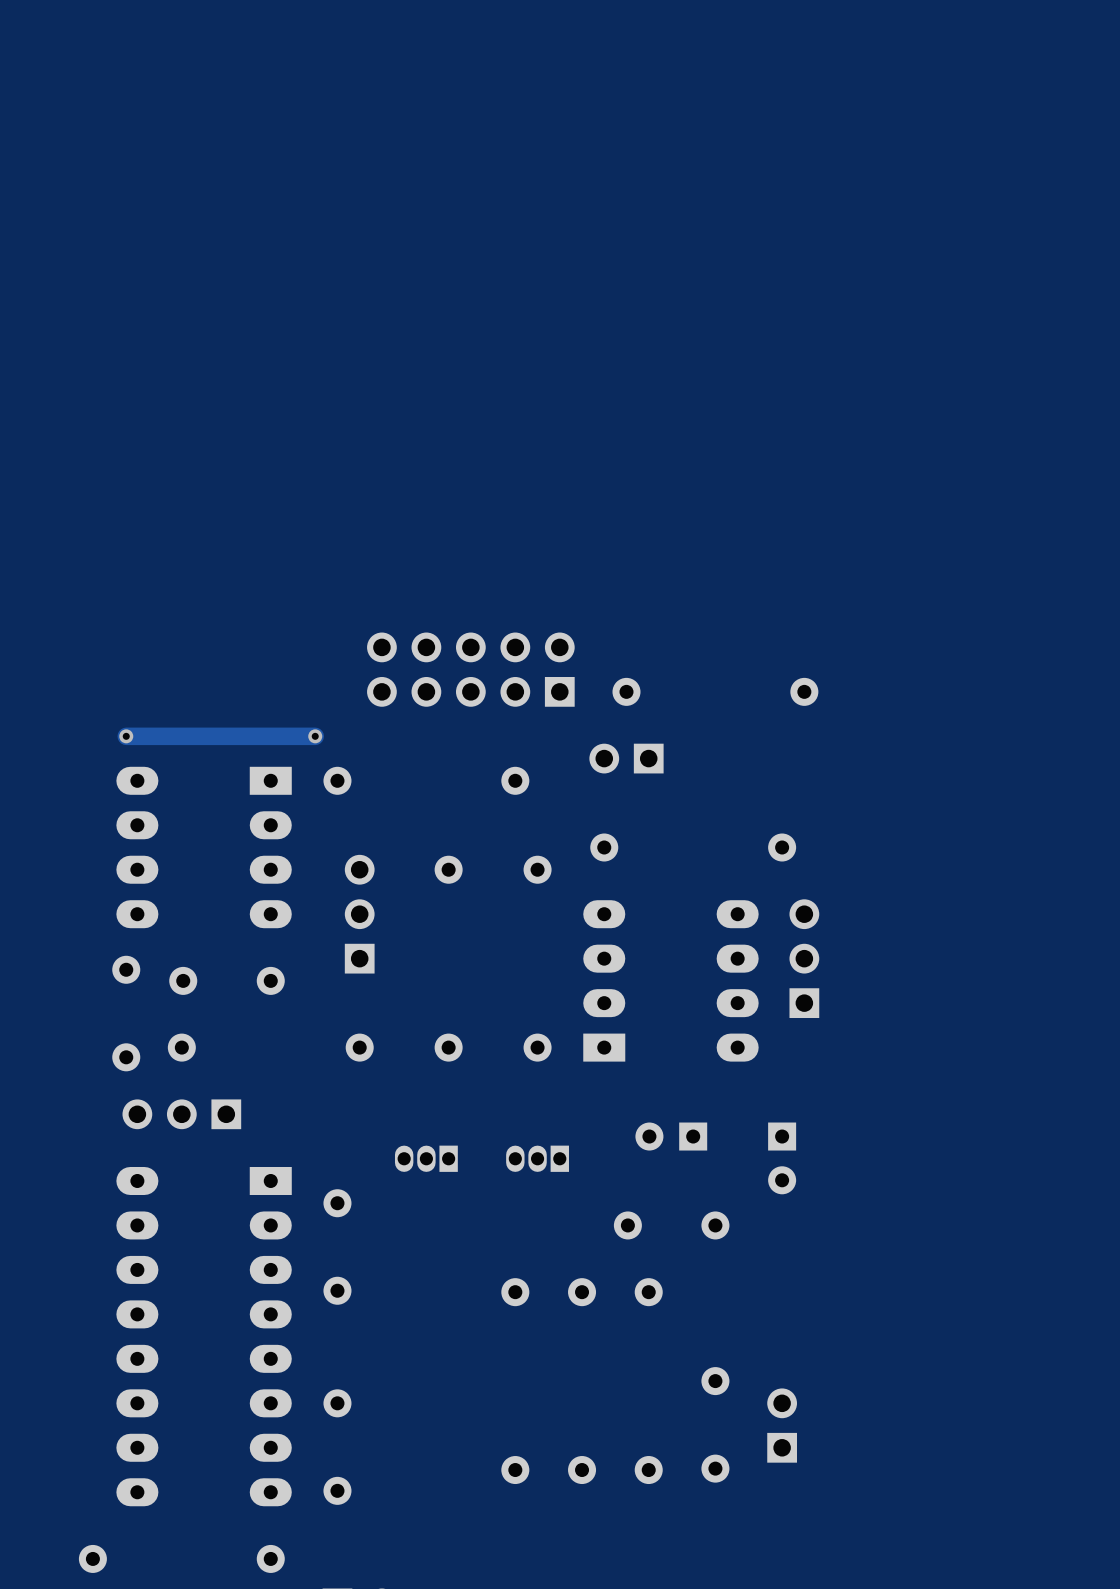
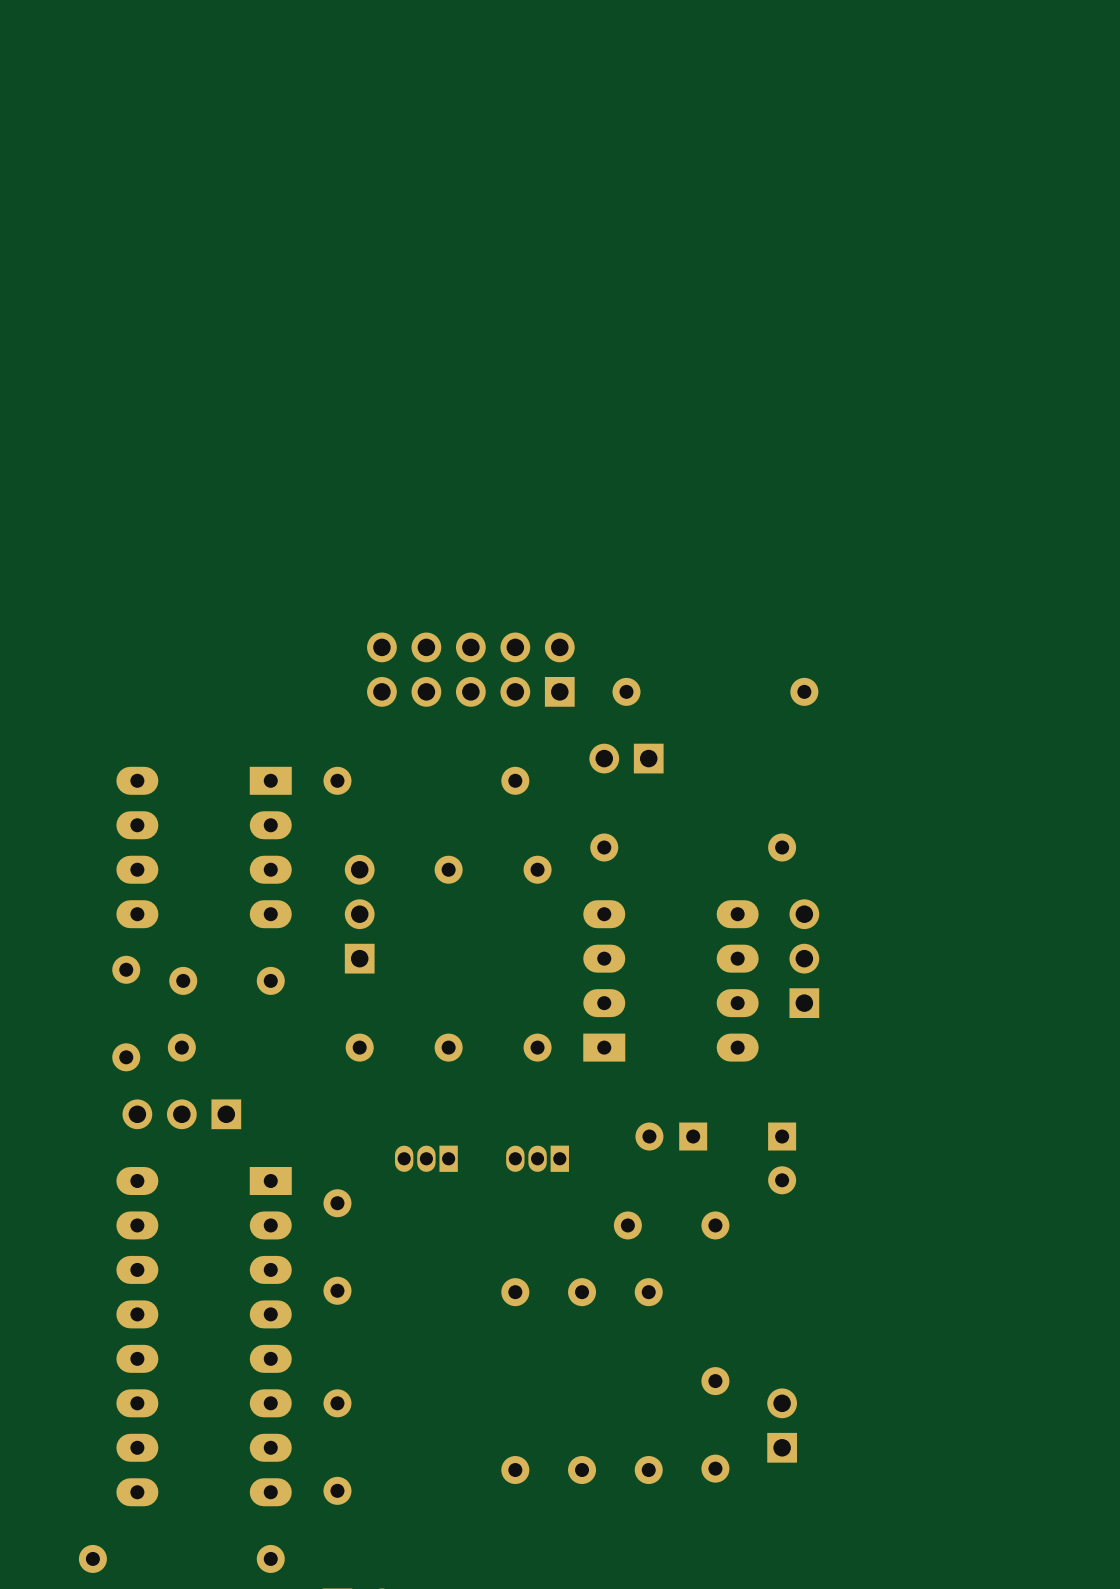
via: (126, 736) -> none
track: (315, 736) (126, 736) -> none
via: (315, 736) -> none

